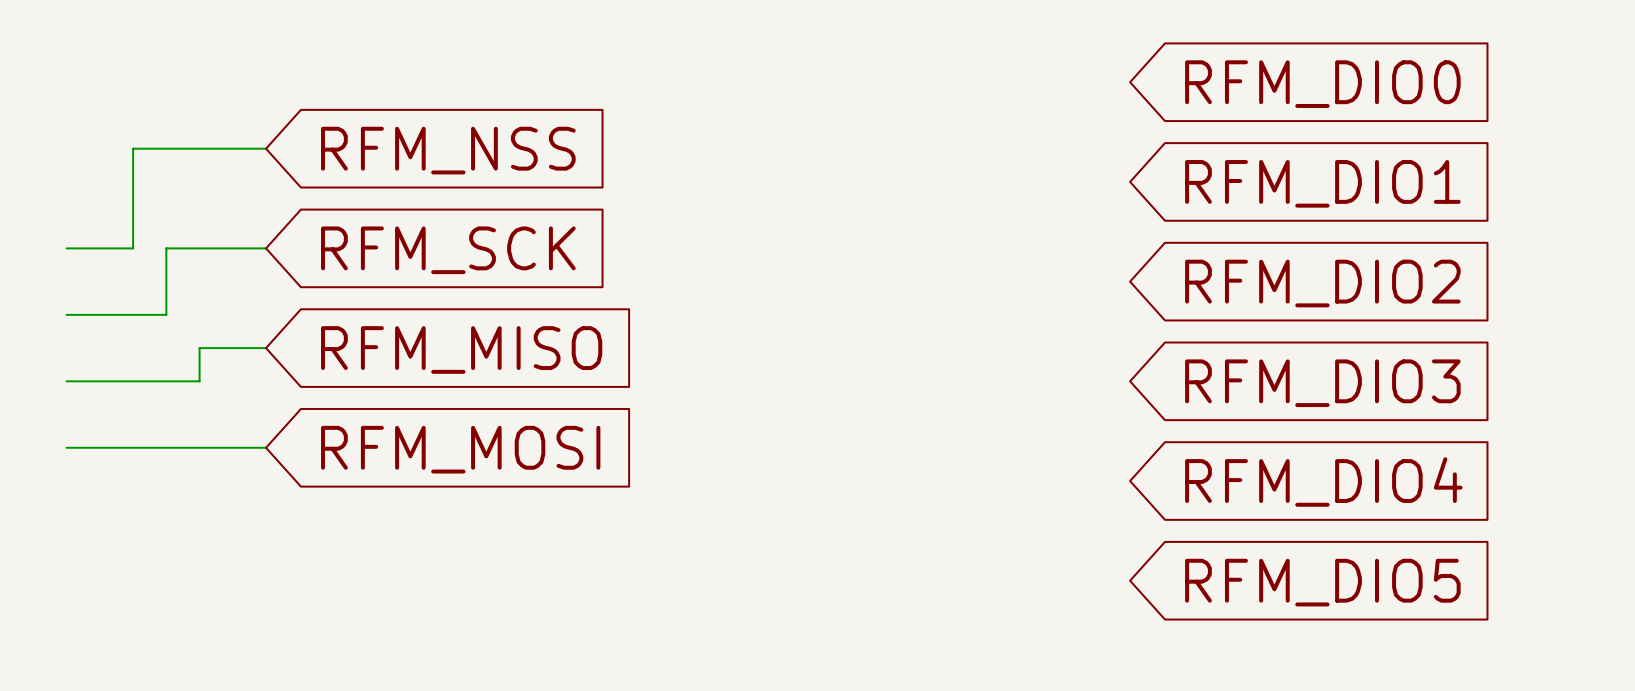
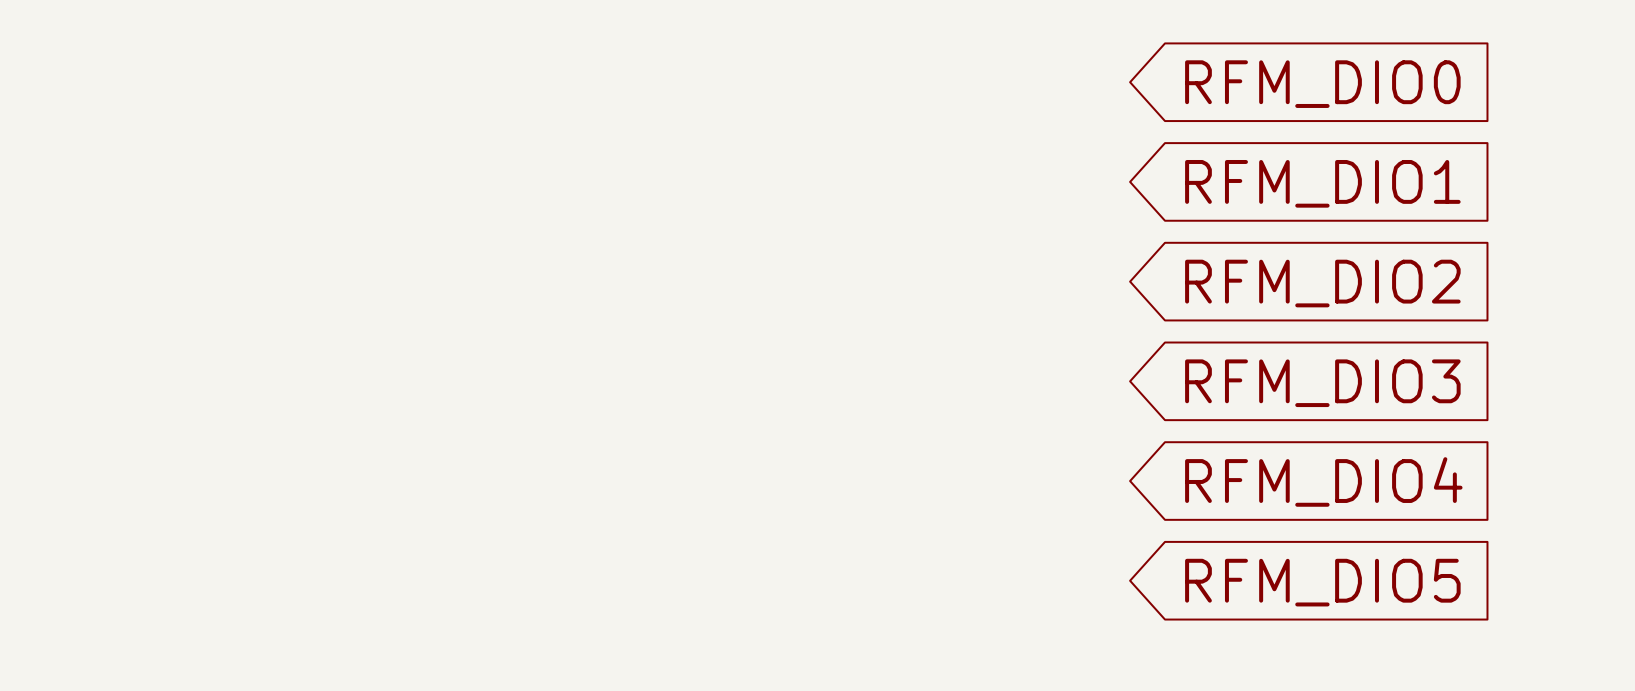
wire: (266, 148) (133, 148) (133, 248) (66, 248) -> none
global label: RFM_NSS (448, 150) -> none
wire: (266, 248) (166, 248) (166, 314) (66, 314) -> none
global label: RFM_SCK (448, 250) -> none
wire: (266, 348) (199, 348) (199, 381) (66, 381) -> none
global label: RFM_MISO (461, 349) -> none
wire: (66, 447) (266, 447) -> none
global label: RFM_MOSI (460, 449) -> none

